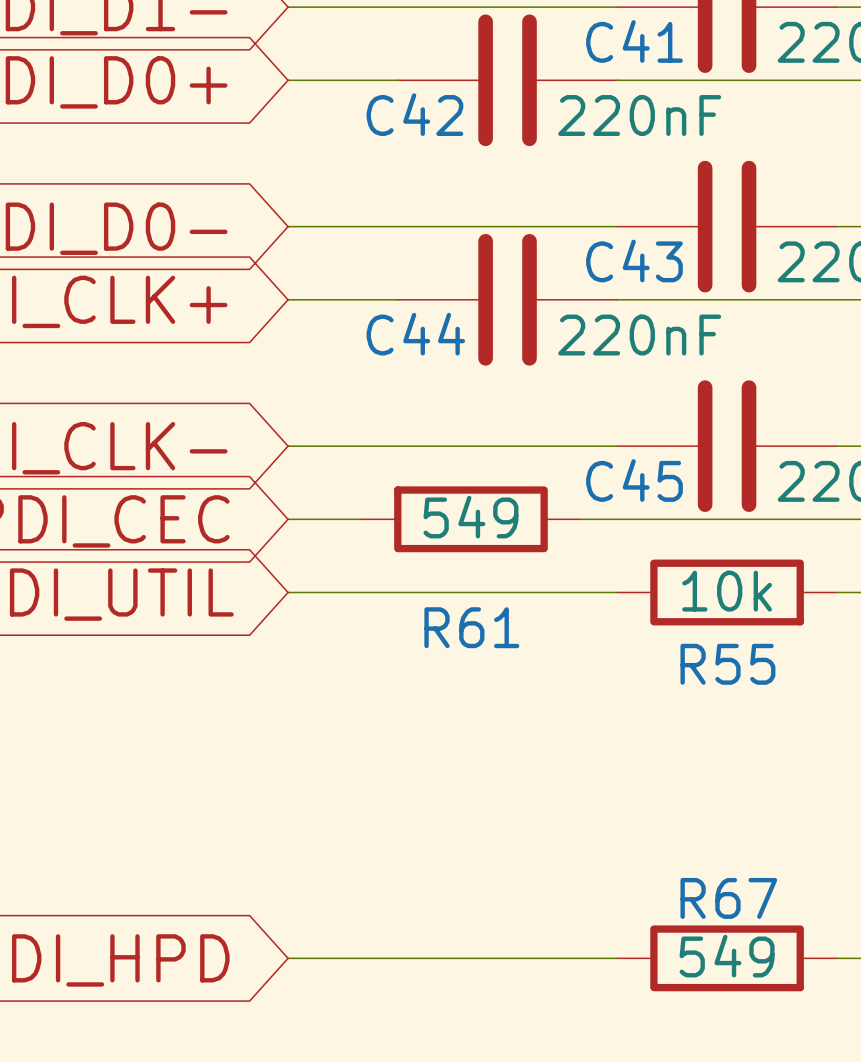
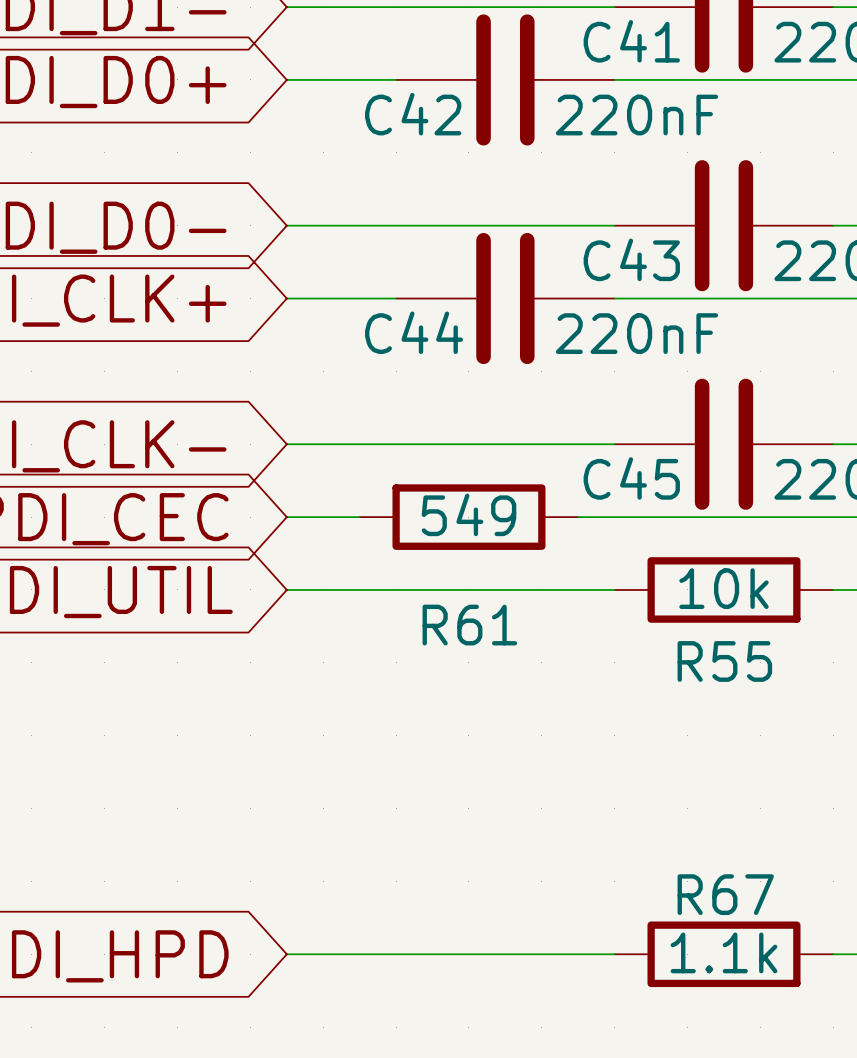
R67 value: 549 (727, 956) -> 1.1k (723, 952)

